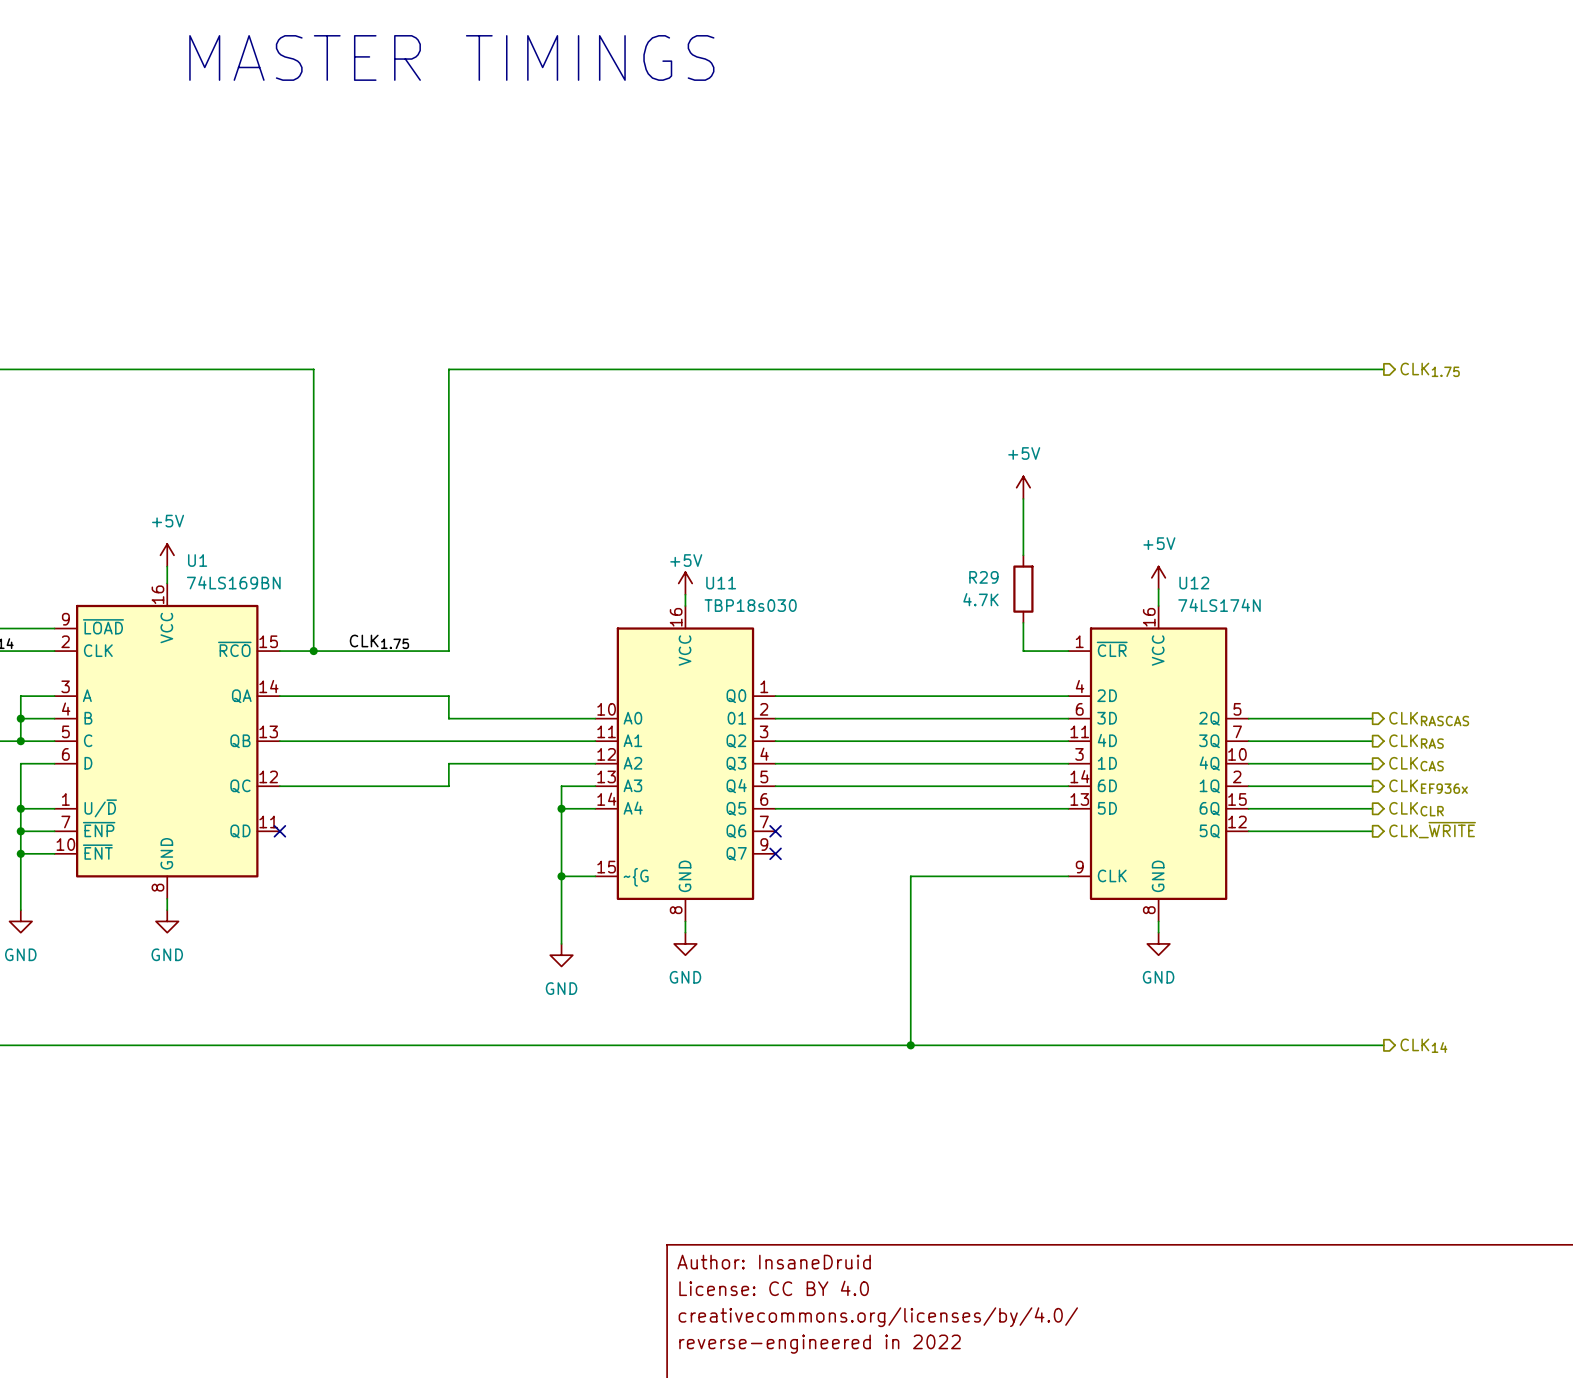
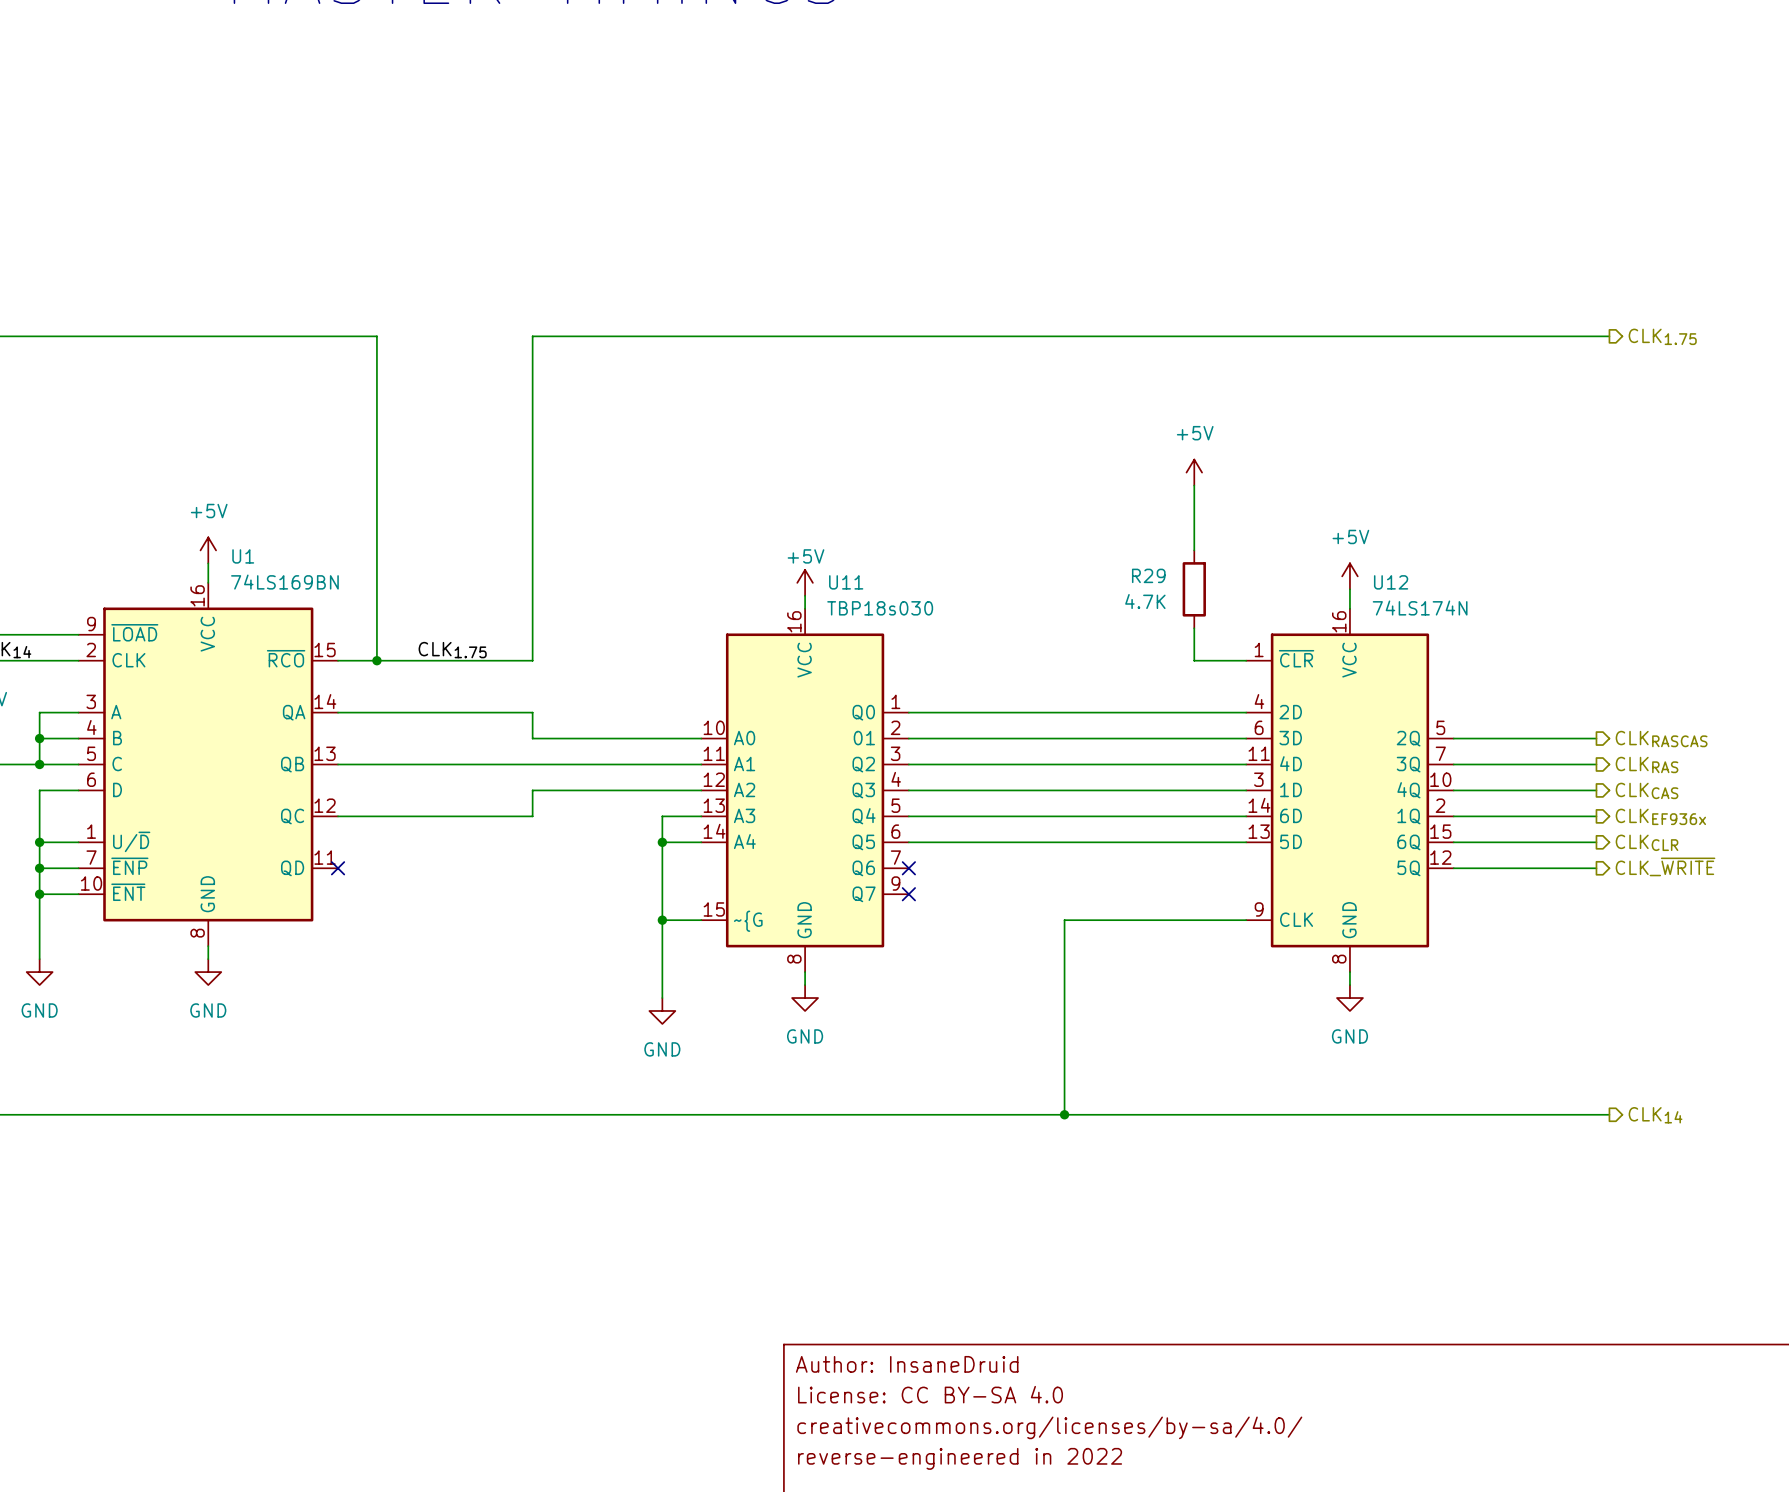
title block: License: CC BY 4.0 (774, 1288) -> License: CC BY-SA 4.0 (930, 1394)
title block: creativecommons.org/licenses/by/4.0/ (878, 1317) -> creativecommons.org/licenses/by-sa/4.0/ (1049, 1427)

